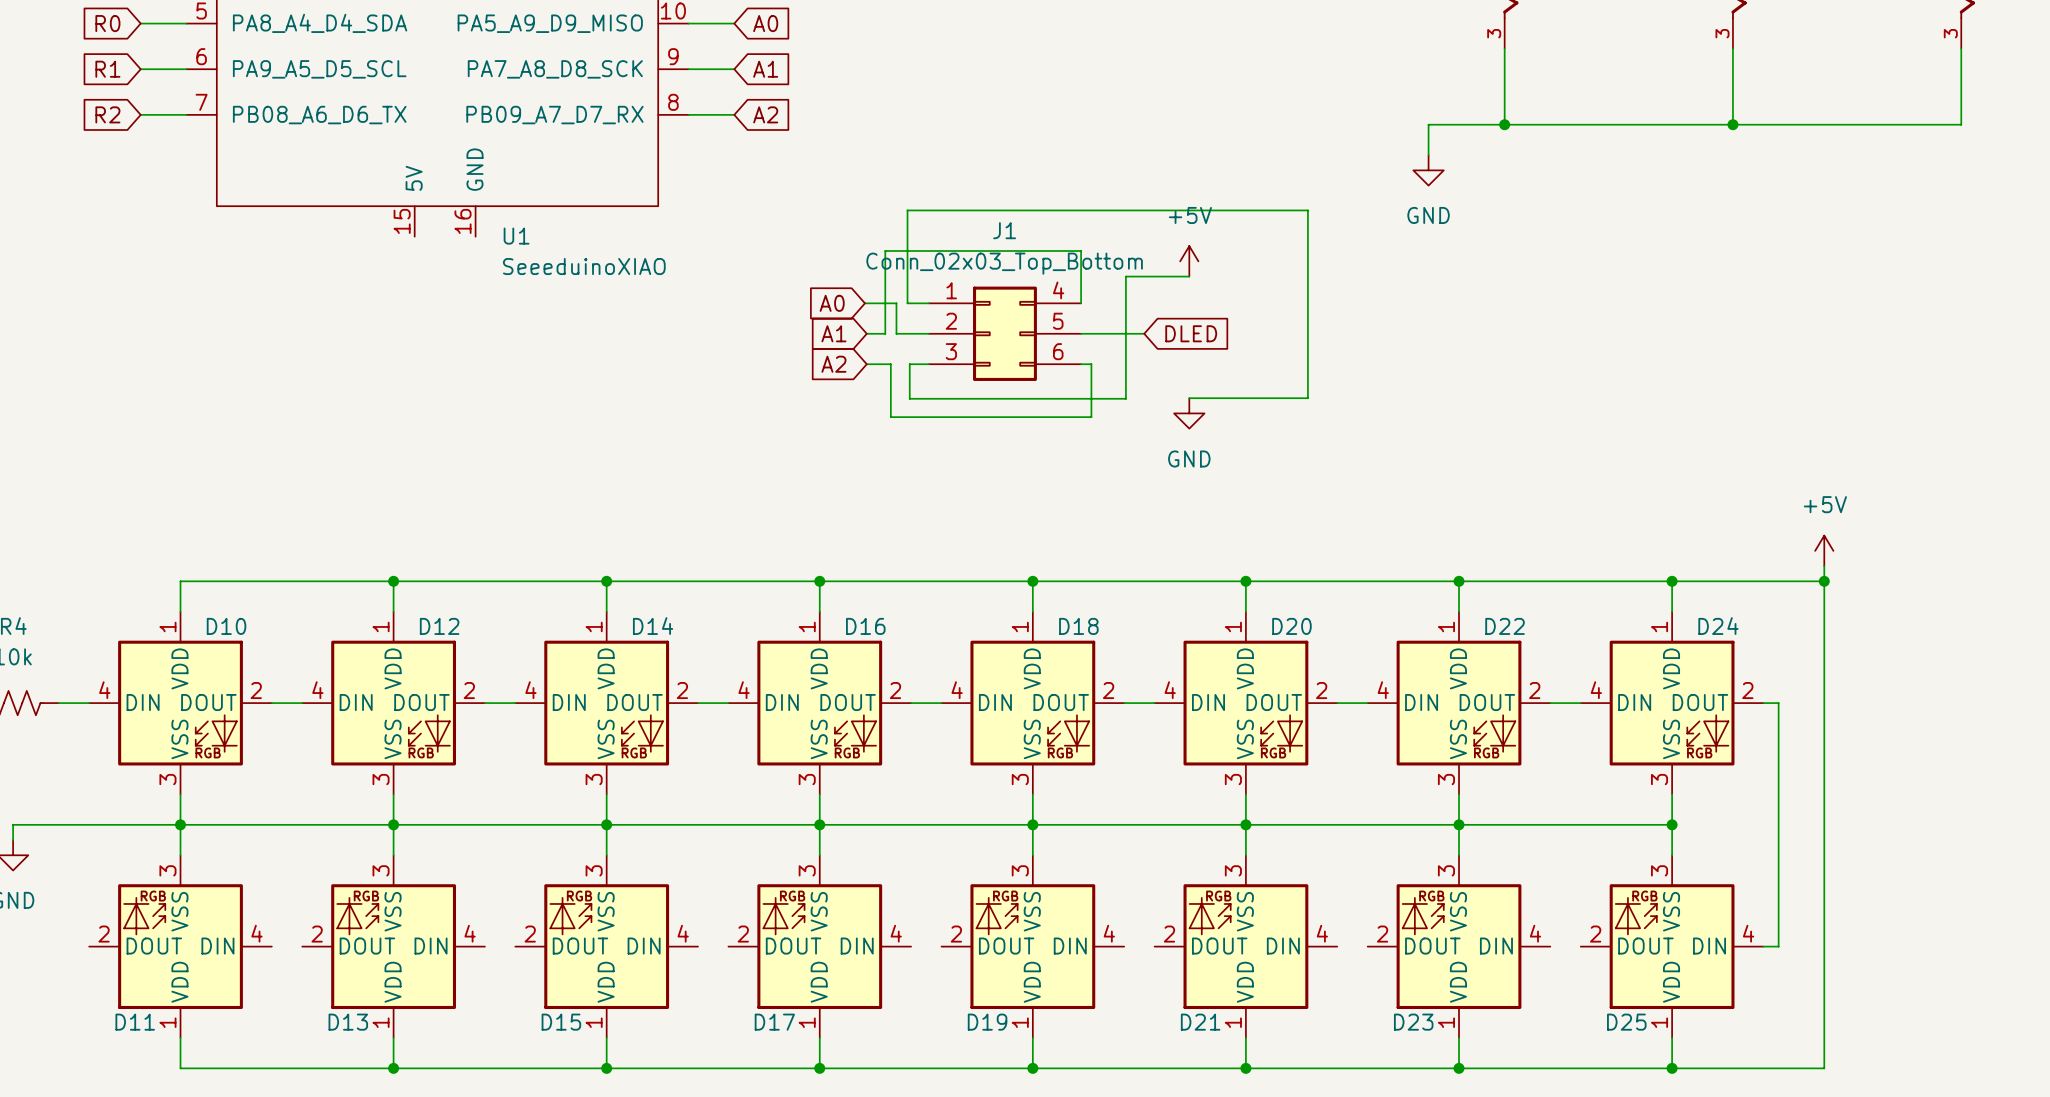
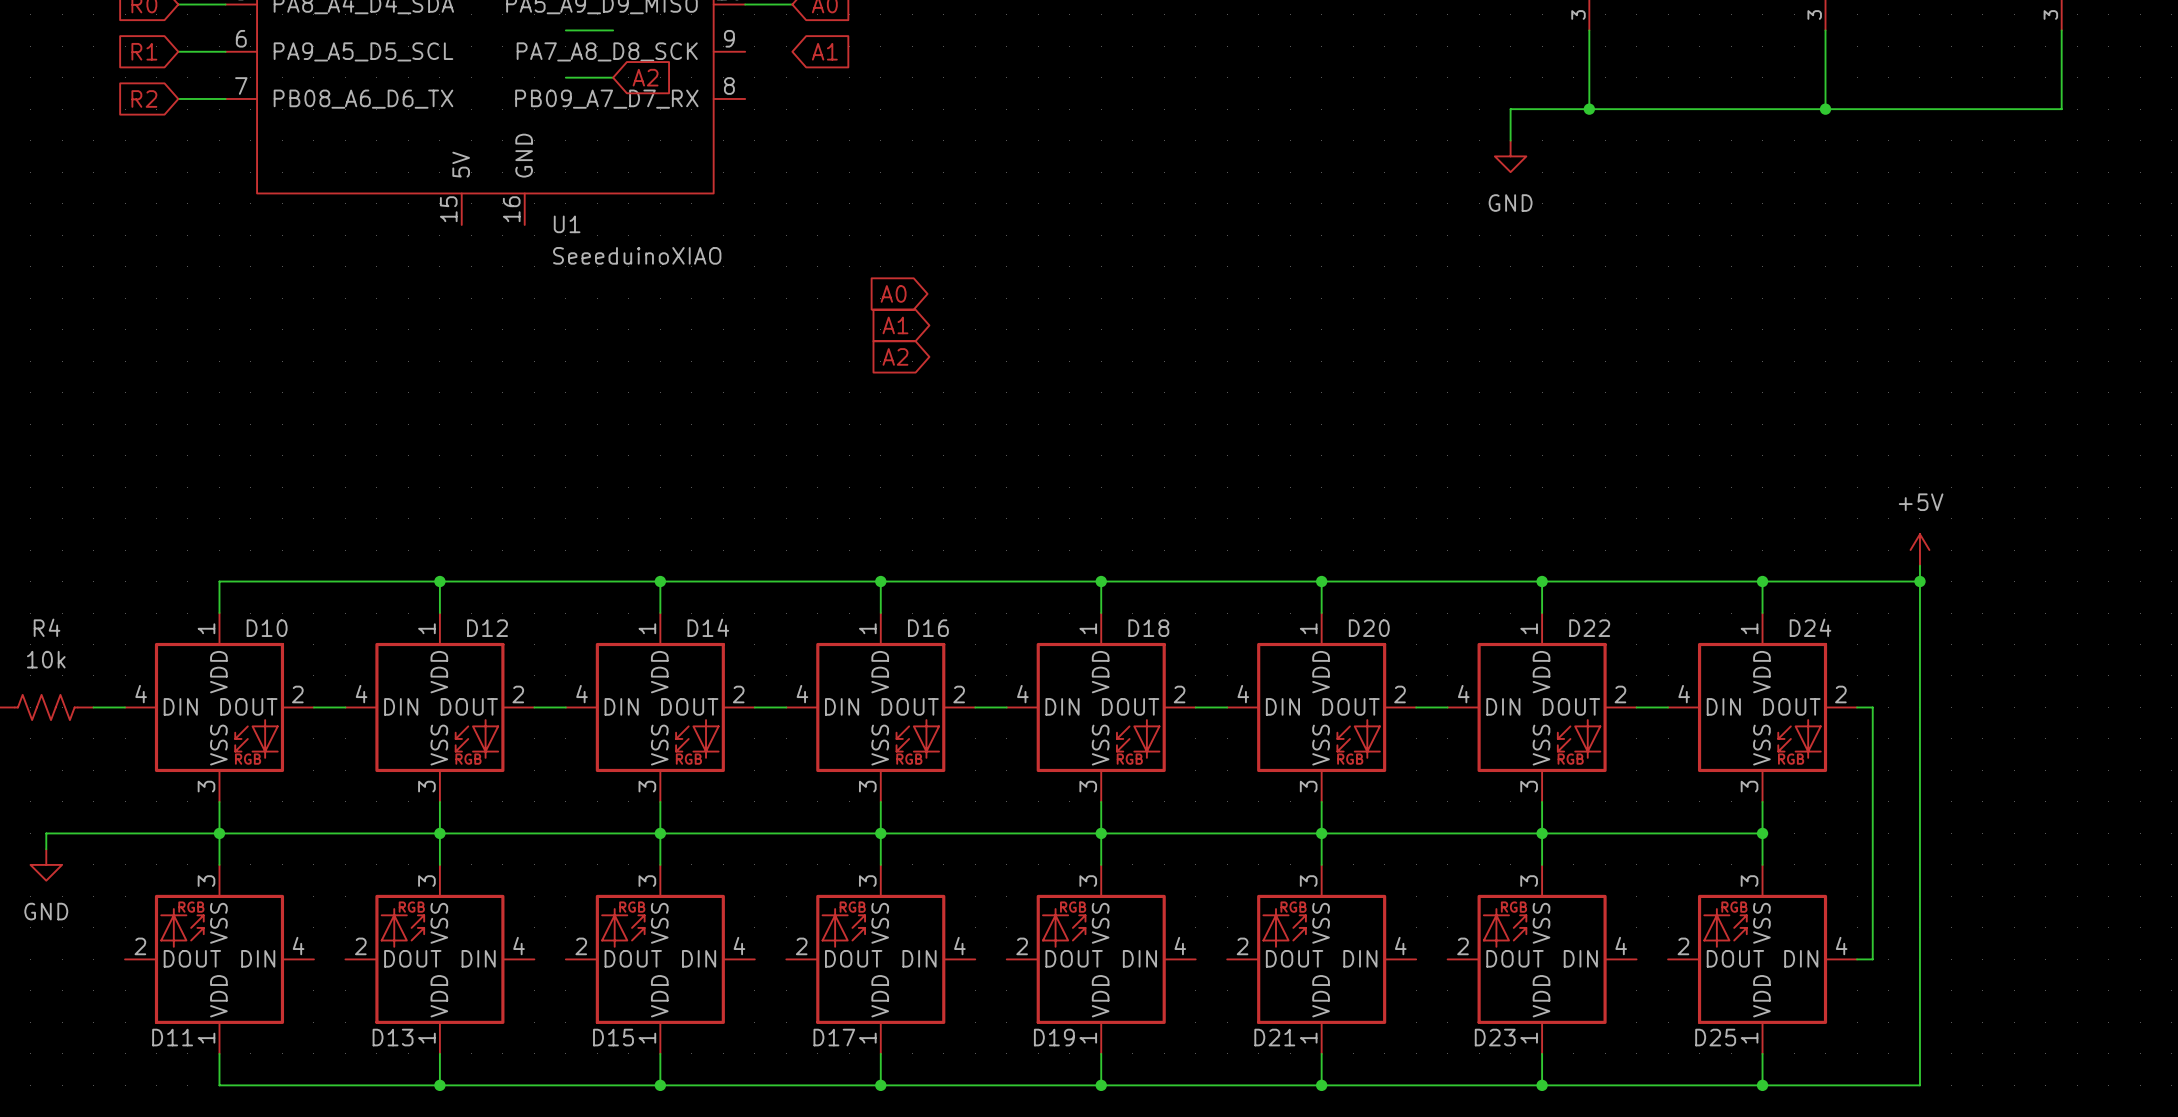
wire: (688, 69) (734, 69) -> (565, 30) (613, 30)
wire: (688, 114) (734, 114) -> (565, 77) (613, 77)
global label position: A2 (765, 114) -> A2 (645, 77)
power symbol: +5V (1189, 261) -> none
wire: (1189, 276) (1125, 276) (1125, 398) (909, 398) (909, 364) (928, 364) -> none
wire: (864, 303) (896, 303) (896, 333) (928, 333) -> none
wire: (928, 303) (907, 303) (907, 210) (1307, 210) (1307, 398) (1189, 398) -> none
wire: (1081, 303) (1081, 251) (885, 251) (885, 333) (866, 333) -> none
J1: Conn_02x03_Top_Bottom (1004, 333) -> none
wire: (1081, 333) (1144, 333) -> none
global label: DLED (1191, 333) -> none
wire: (866, 364) (890, 364) (890, 417) (1091, 417) (1091, 364) (1081, 364) -> none
power symbol: GND (1189, 413) -> none

